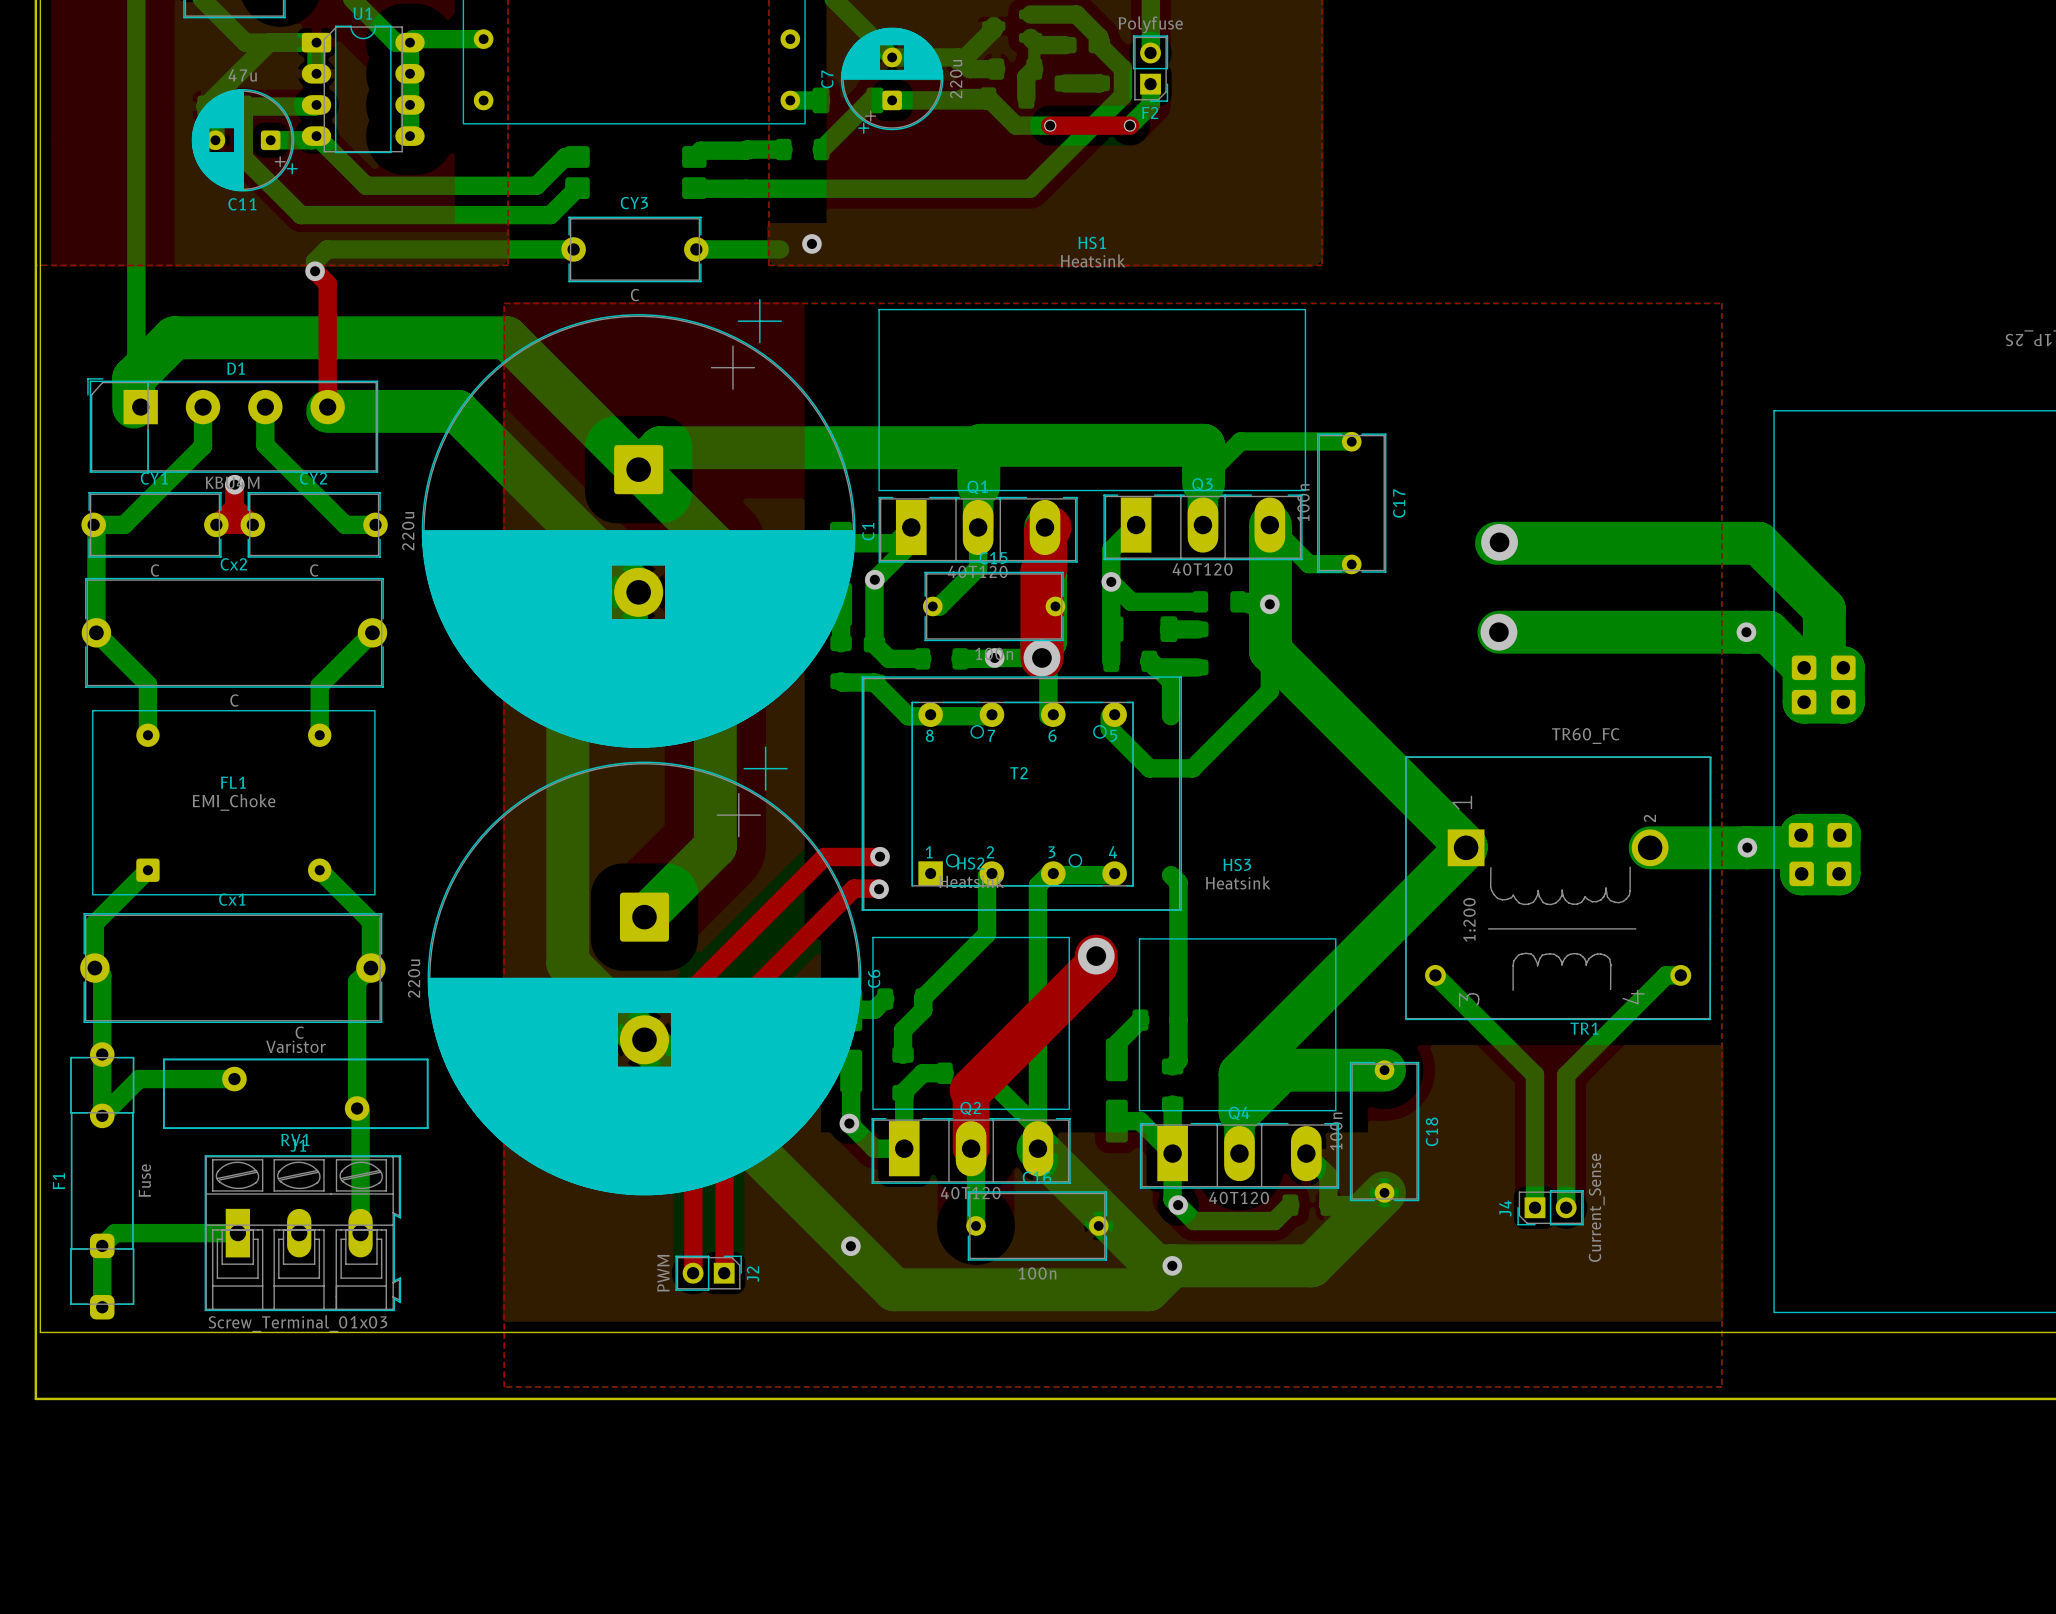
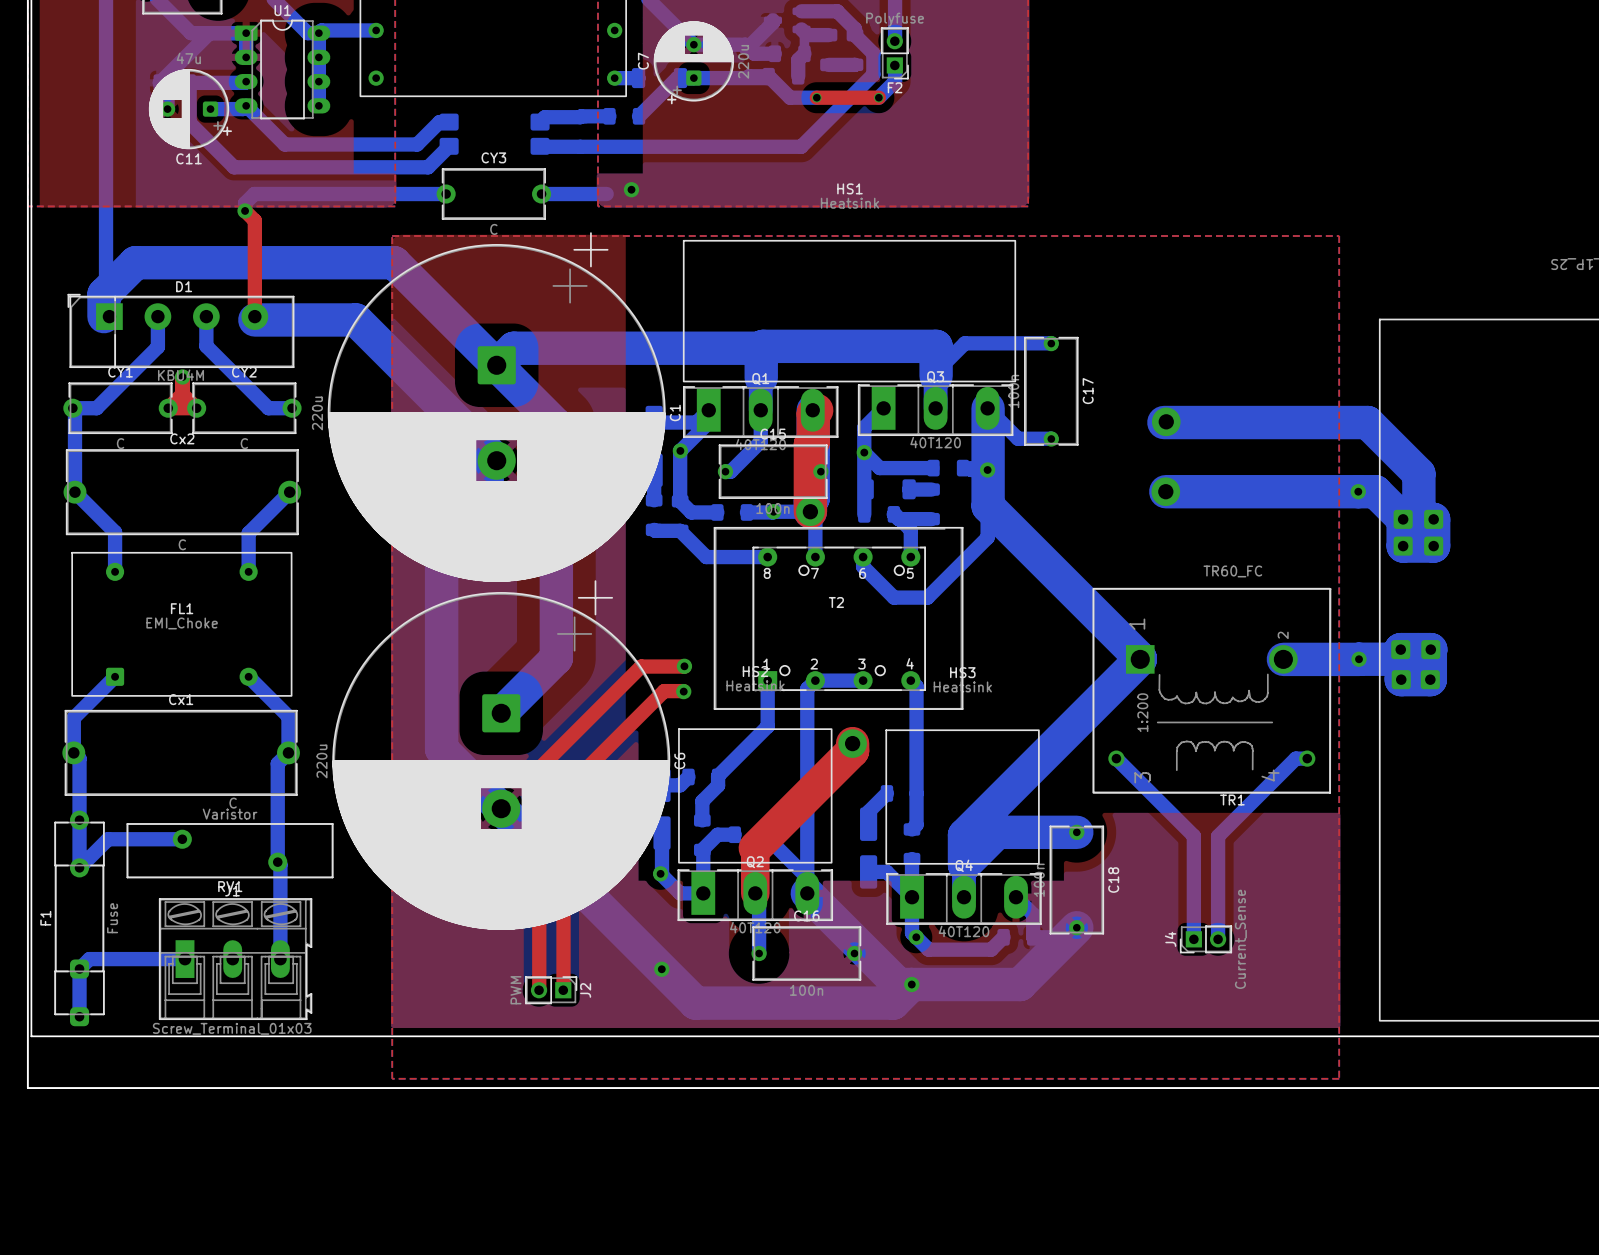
T2 position: (1021, 793) -> (838, 618)

